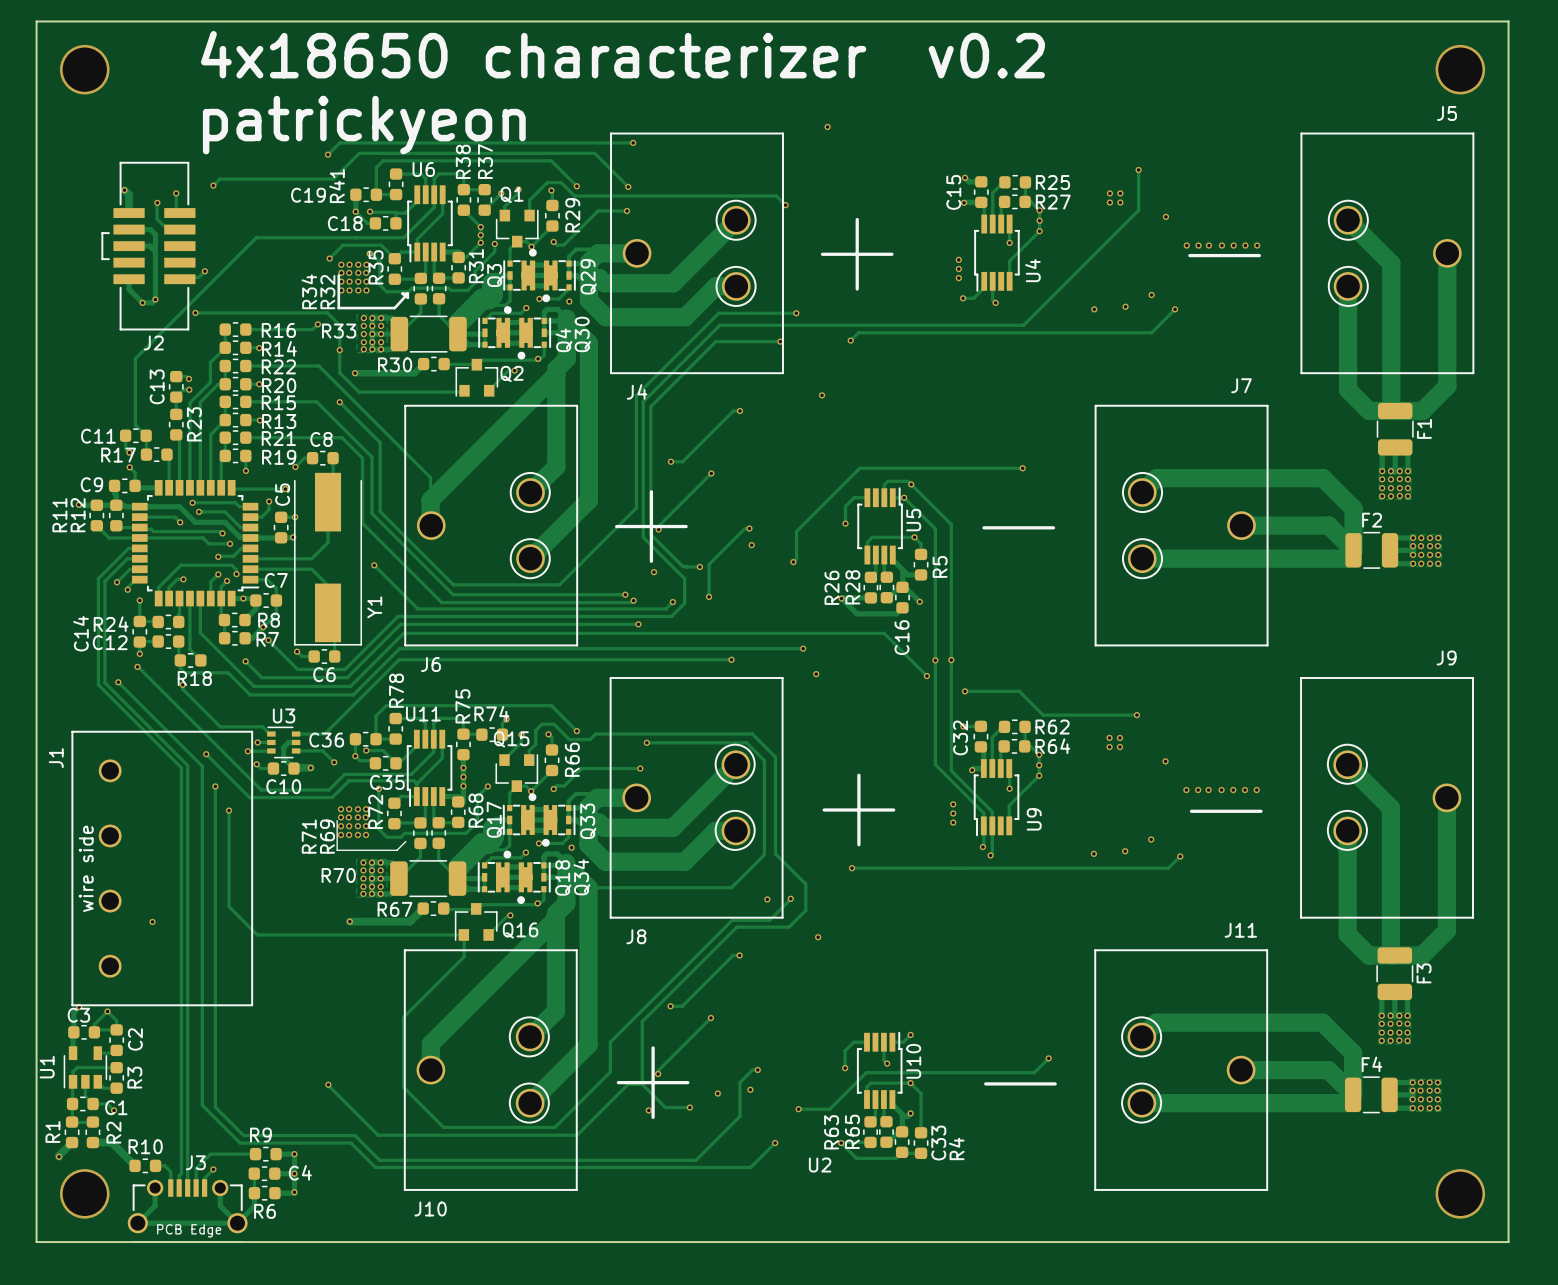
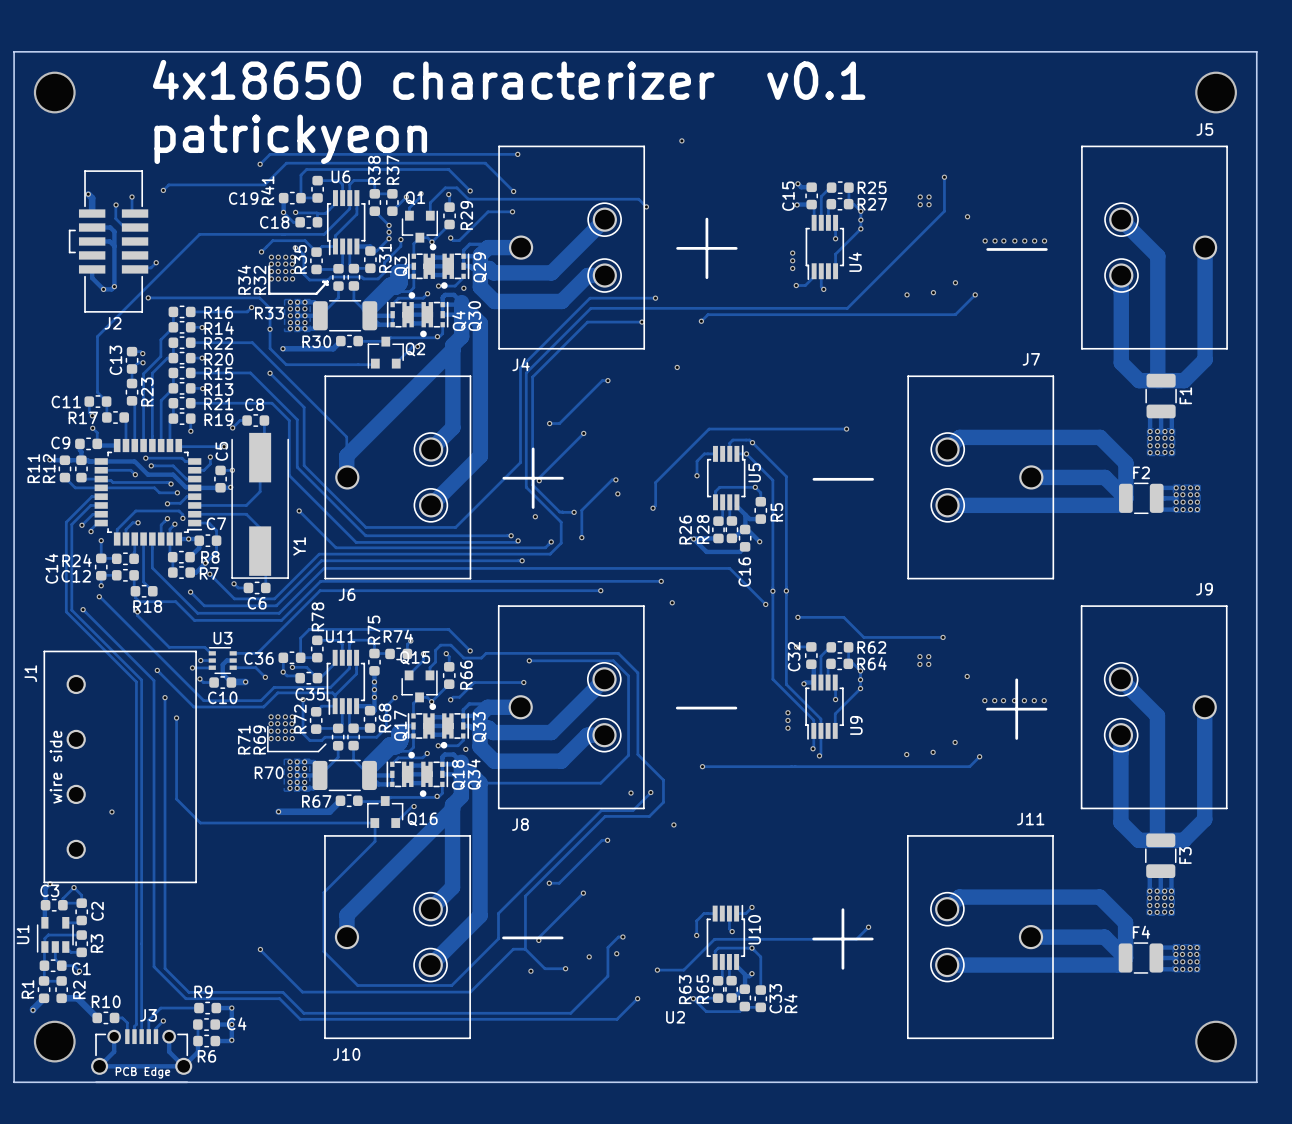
text: 4x18650 characterizer v0.2 (622, 54) -> 4x18650 characterizer v0.1 (509, 79)
drawing shape: [714, 743, 1368, 851] -> [586, 662, 1139, 753]
drawing shape: [508, 1016, 1163, 1124] -> [413, 891, 965, 983]

